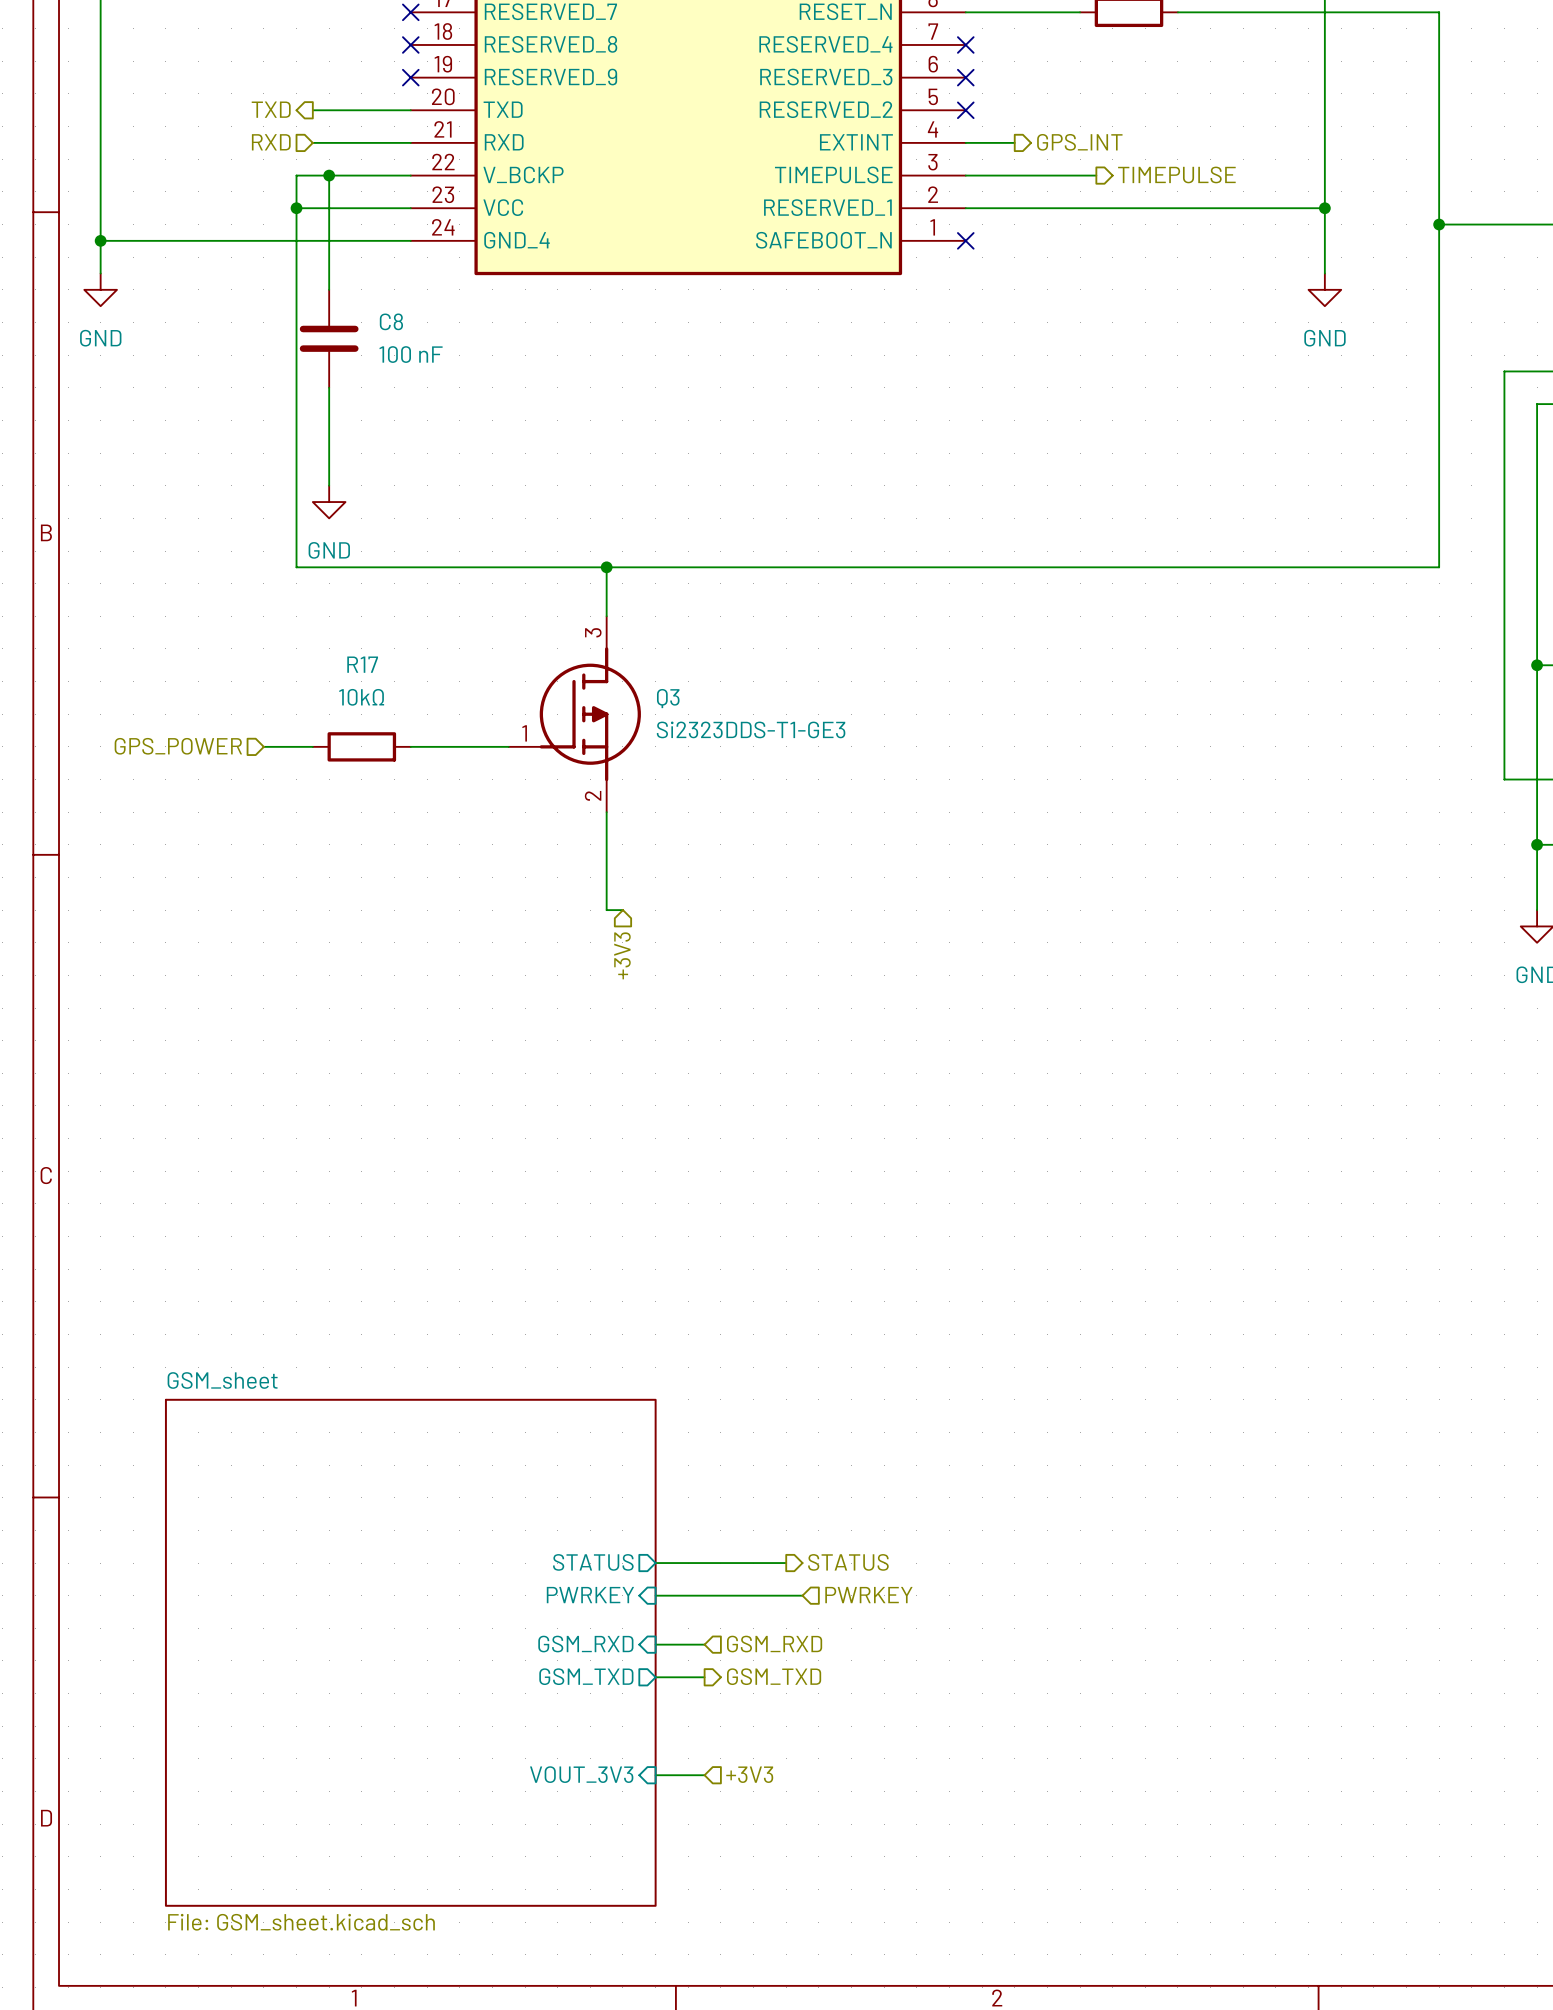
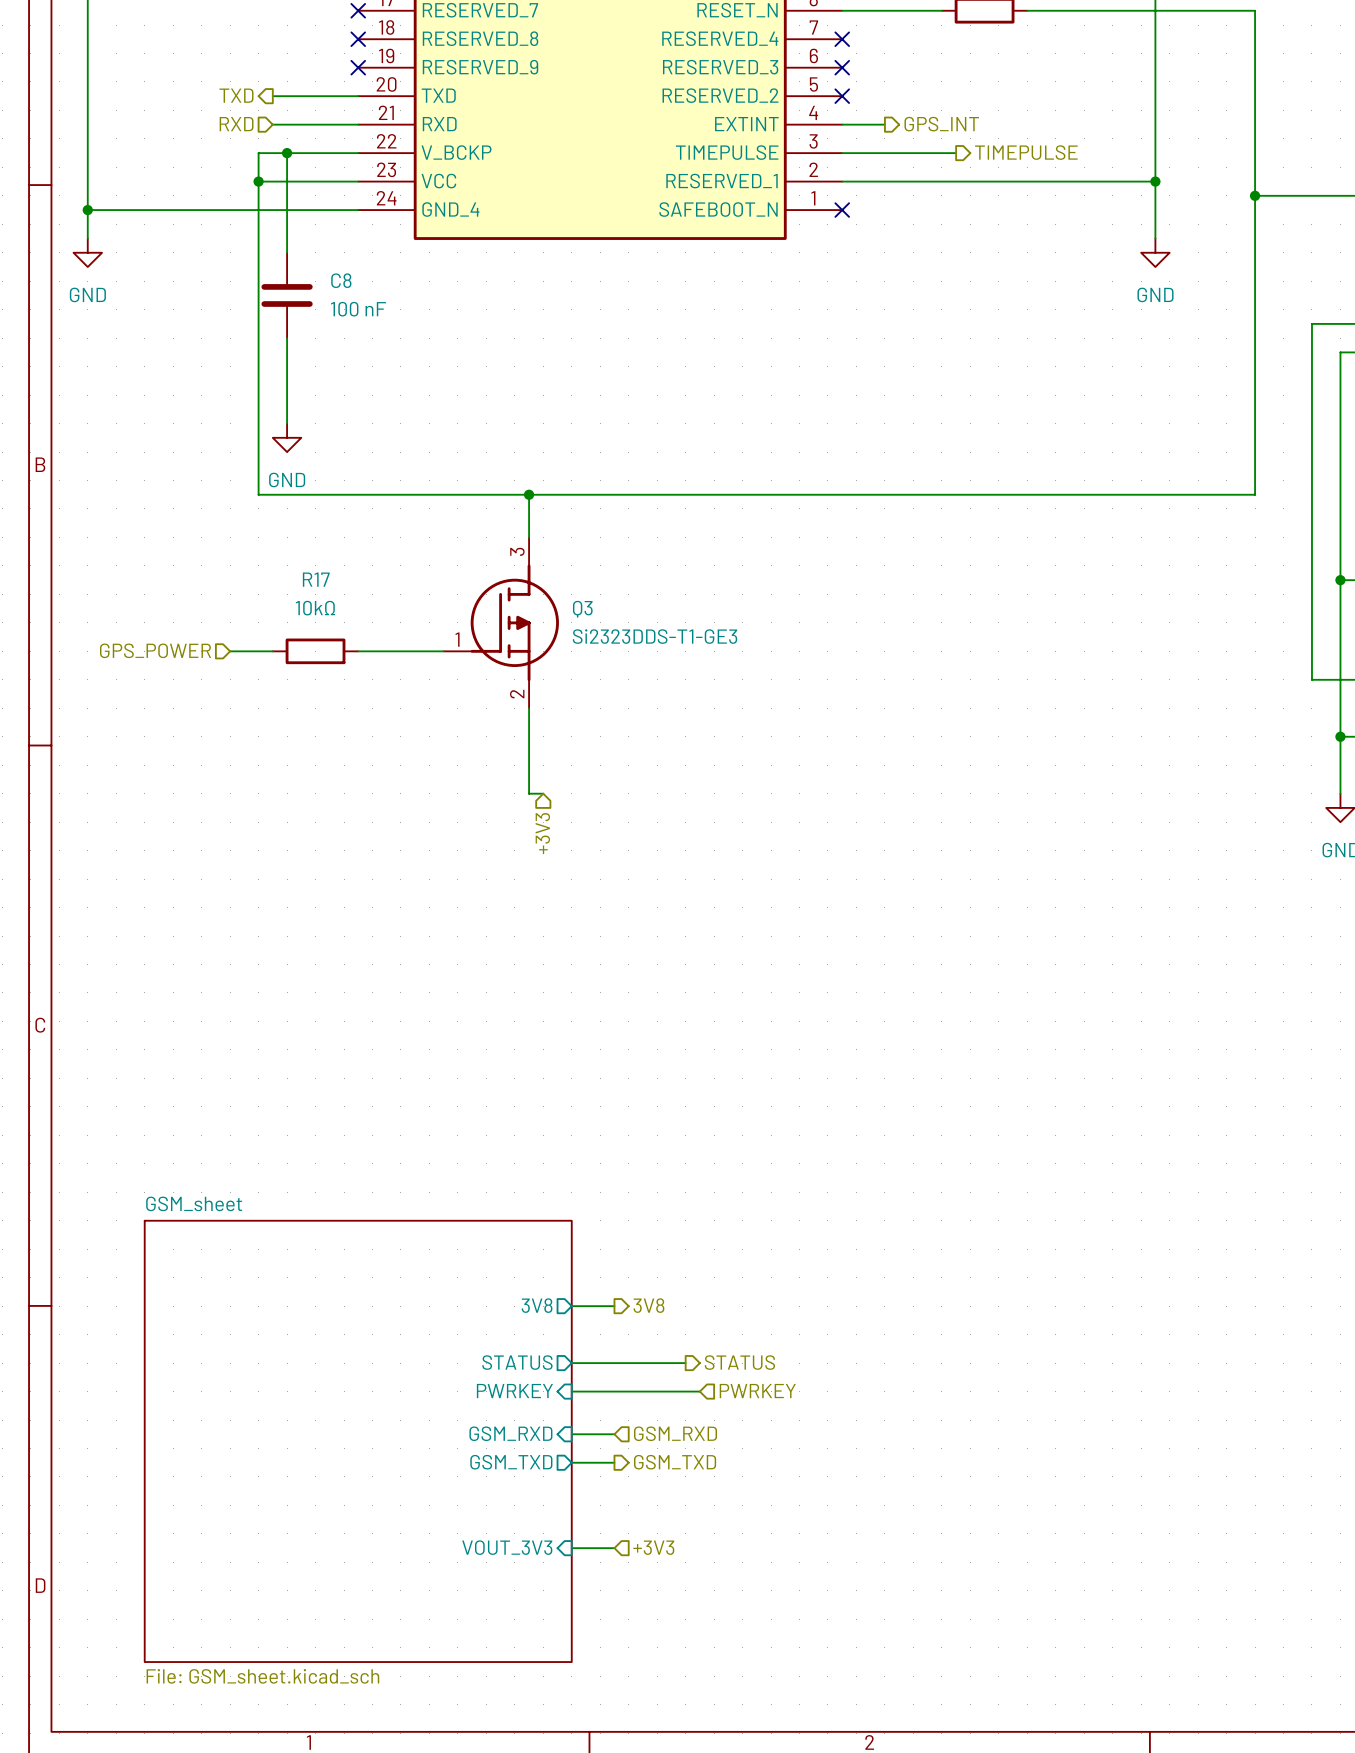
sheet pin: none -> 3V8 (537, 1305)
wire: none -> (571, 1306) (614, 1306)
hierarchical label: none -> 3V8 (648, 1305)

